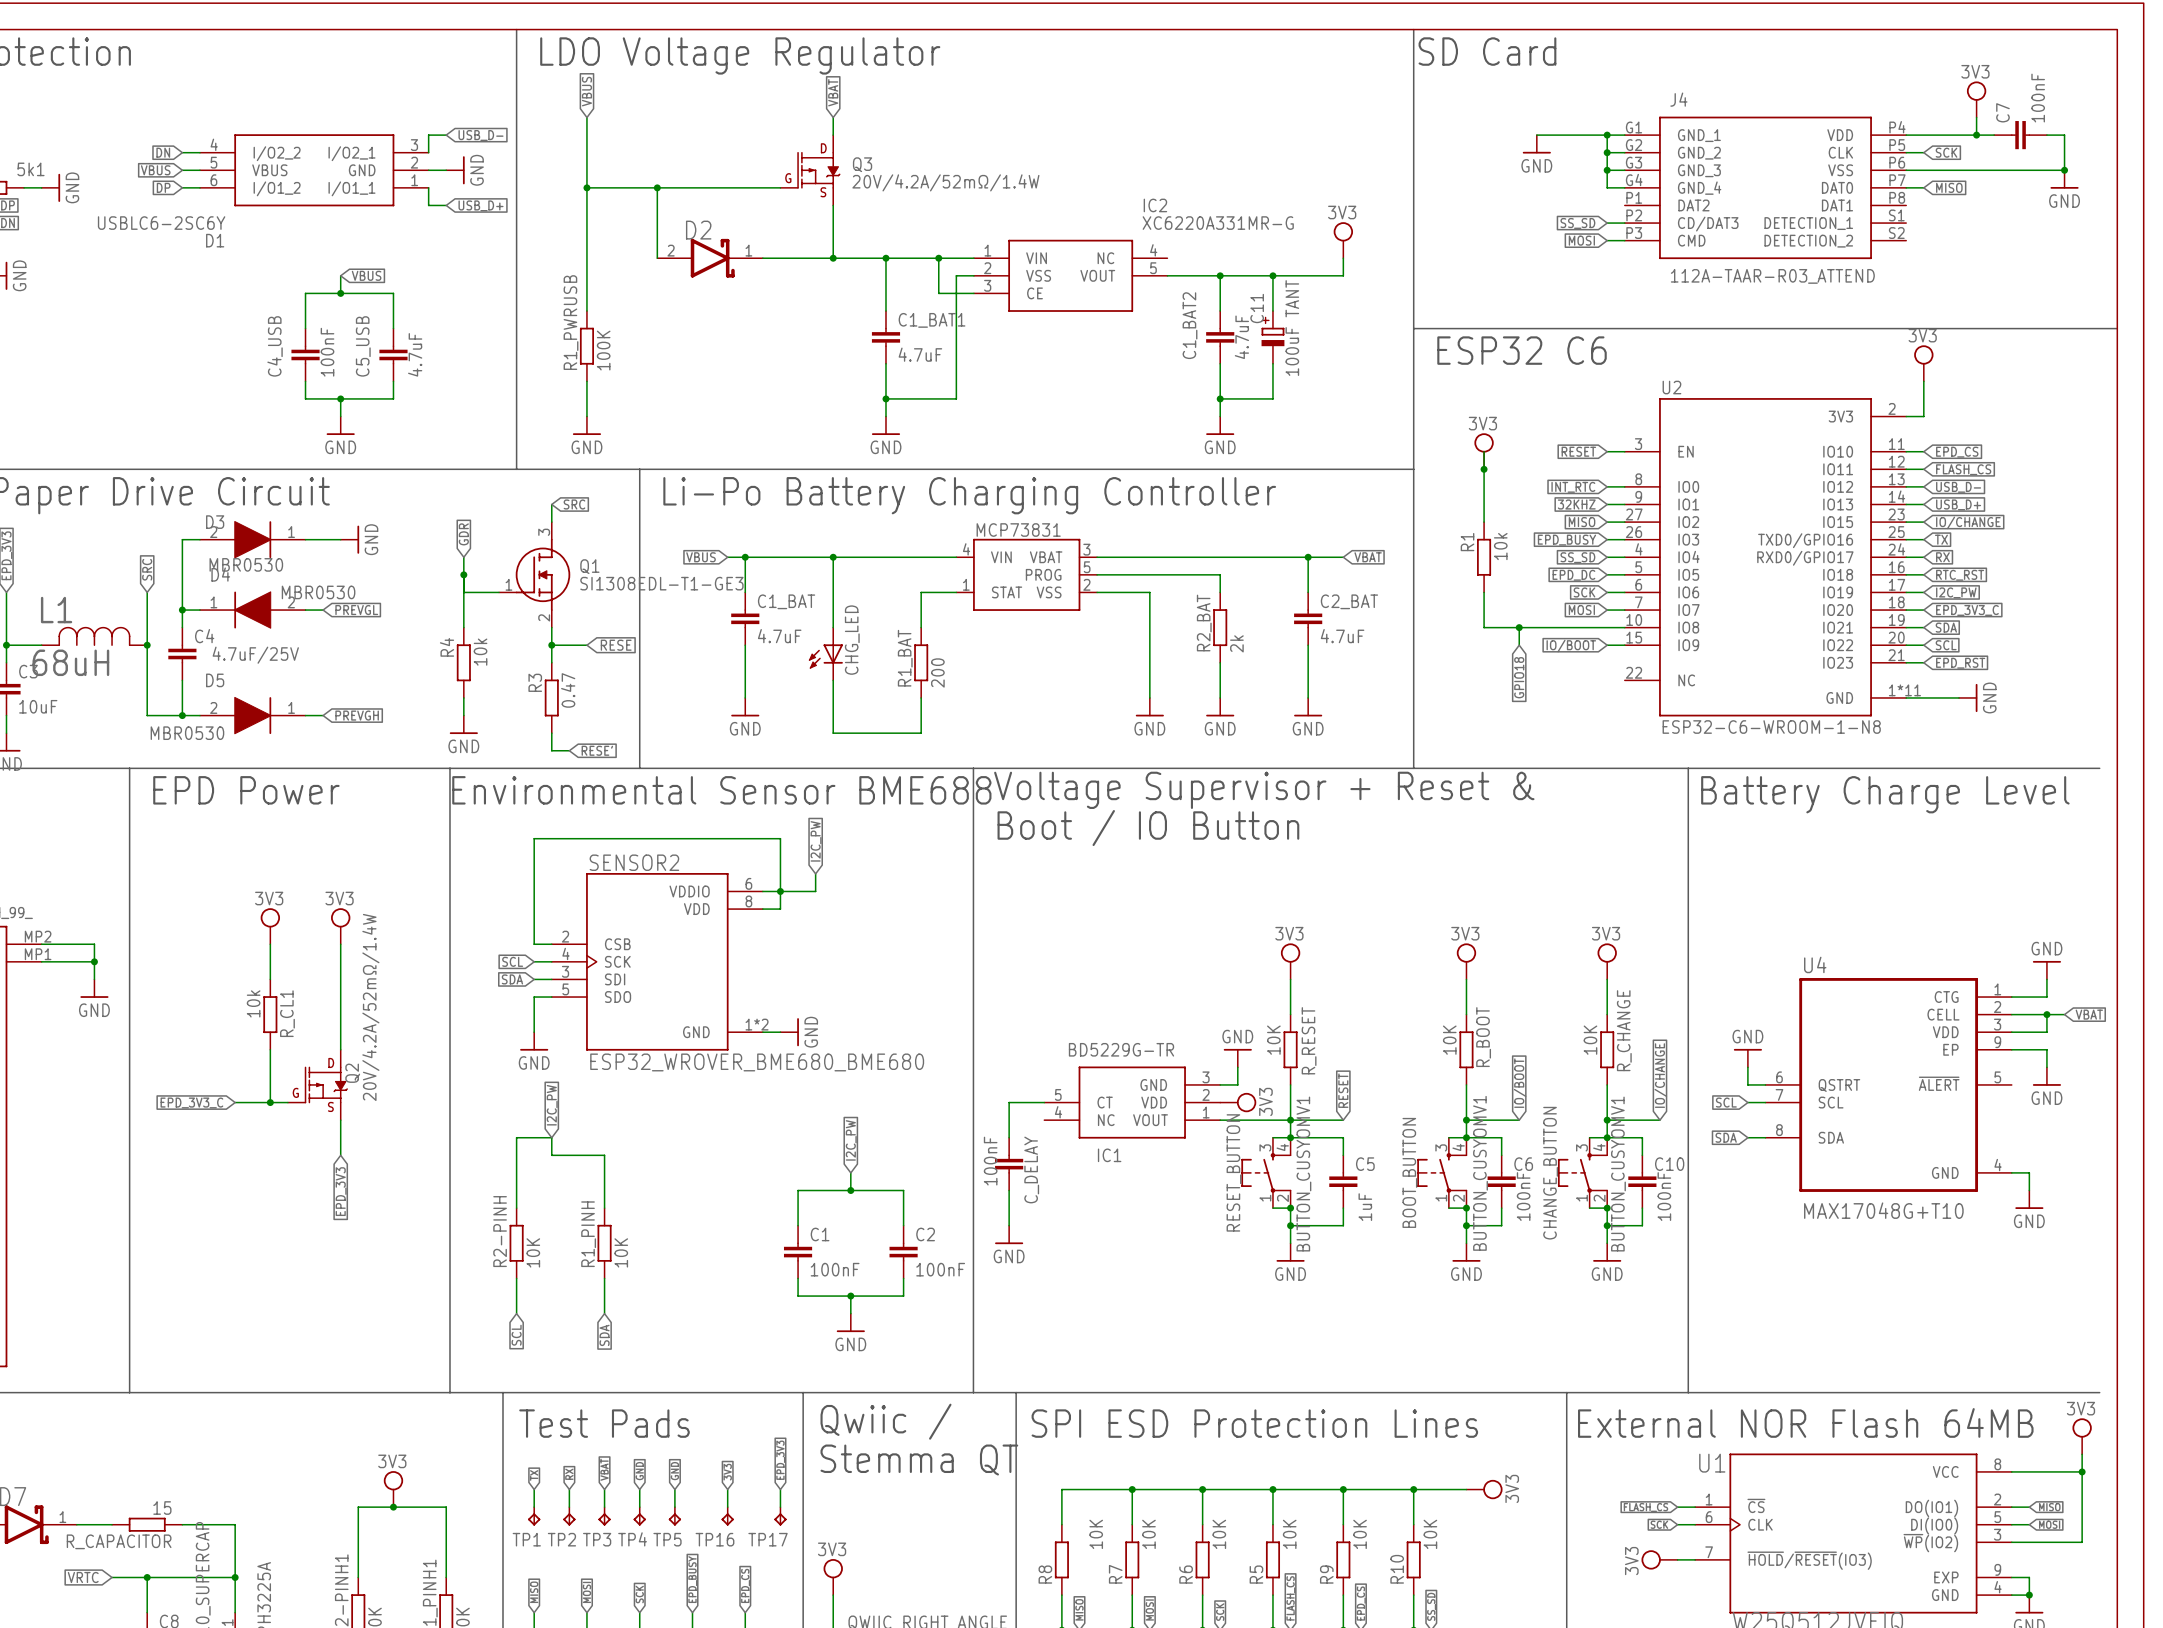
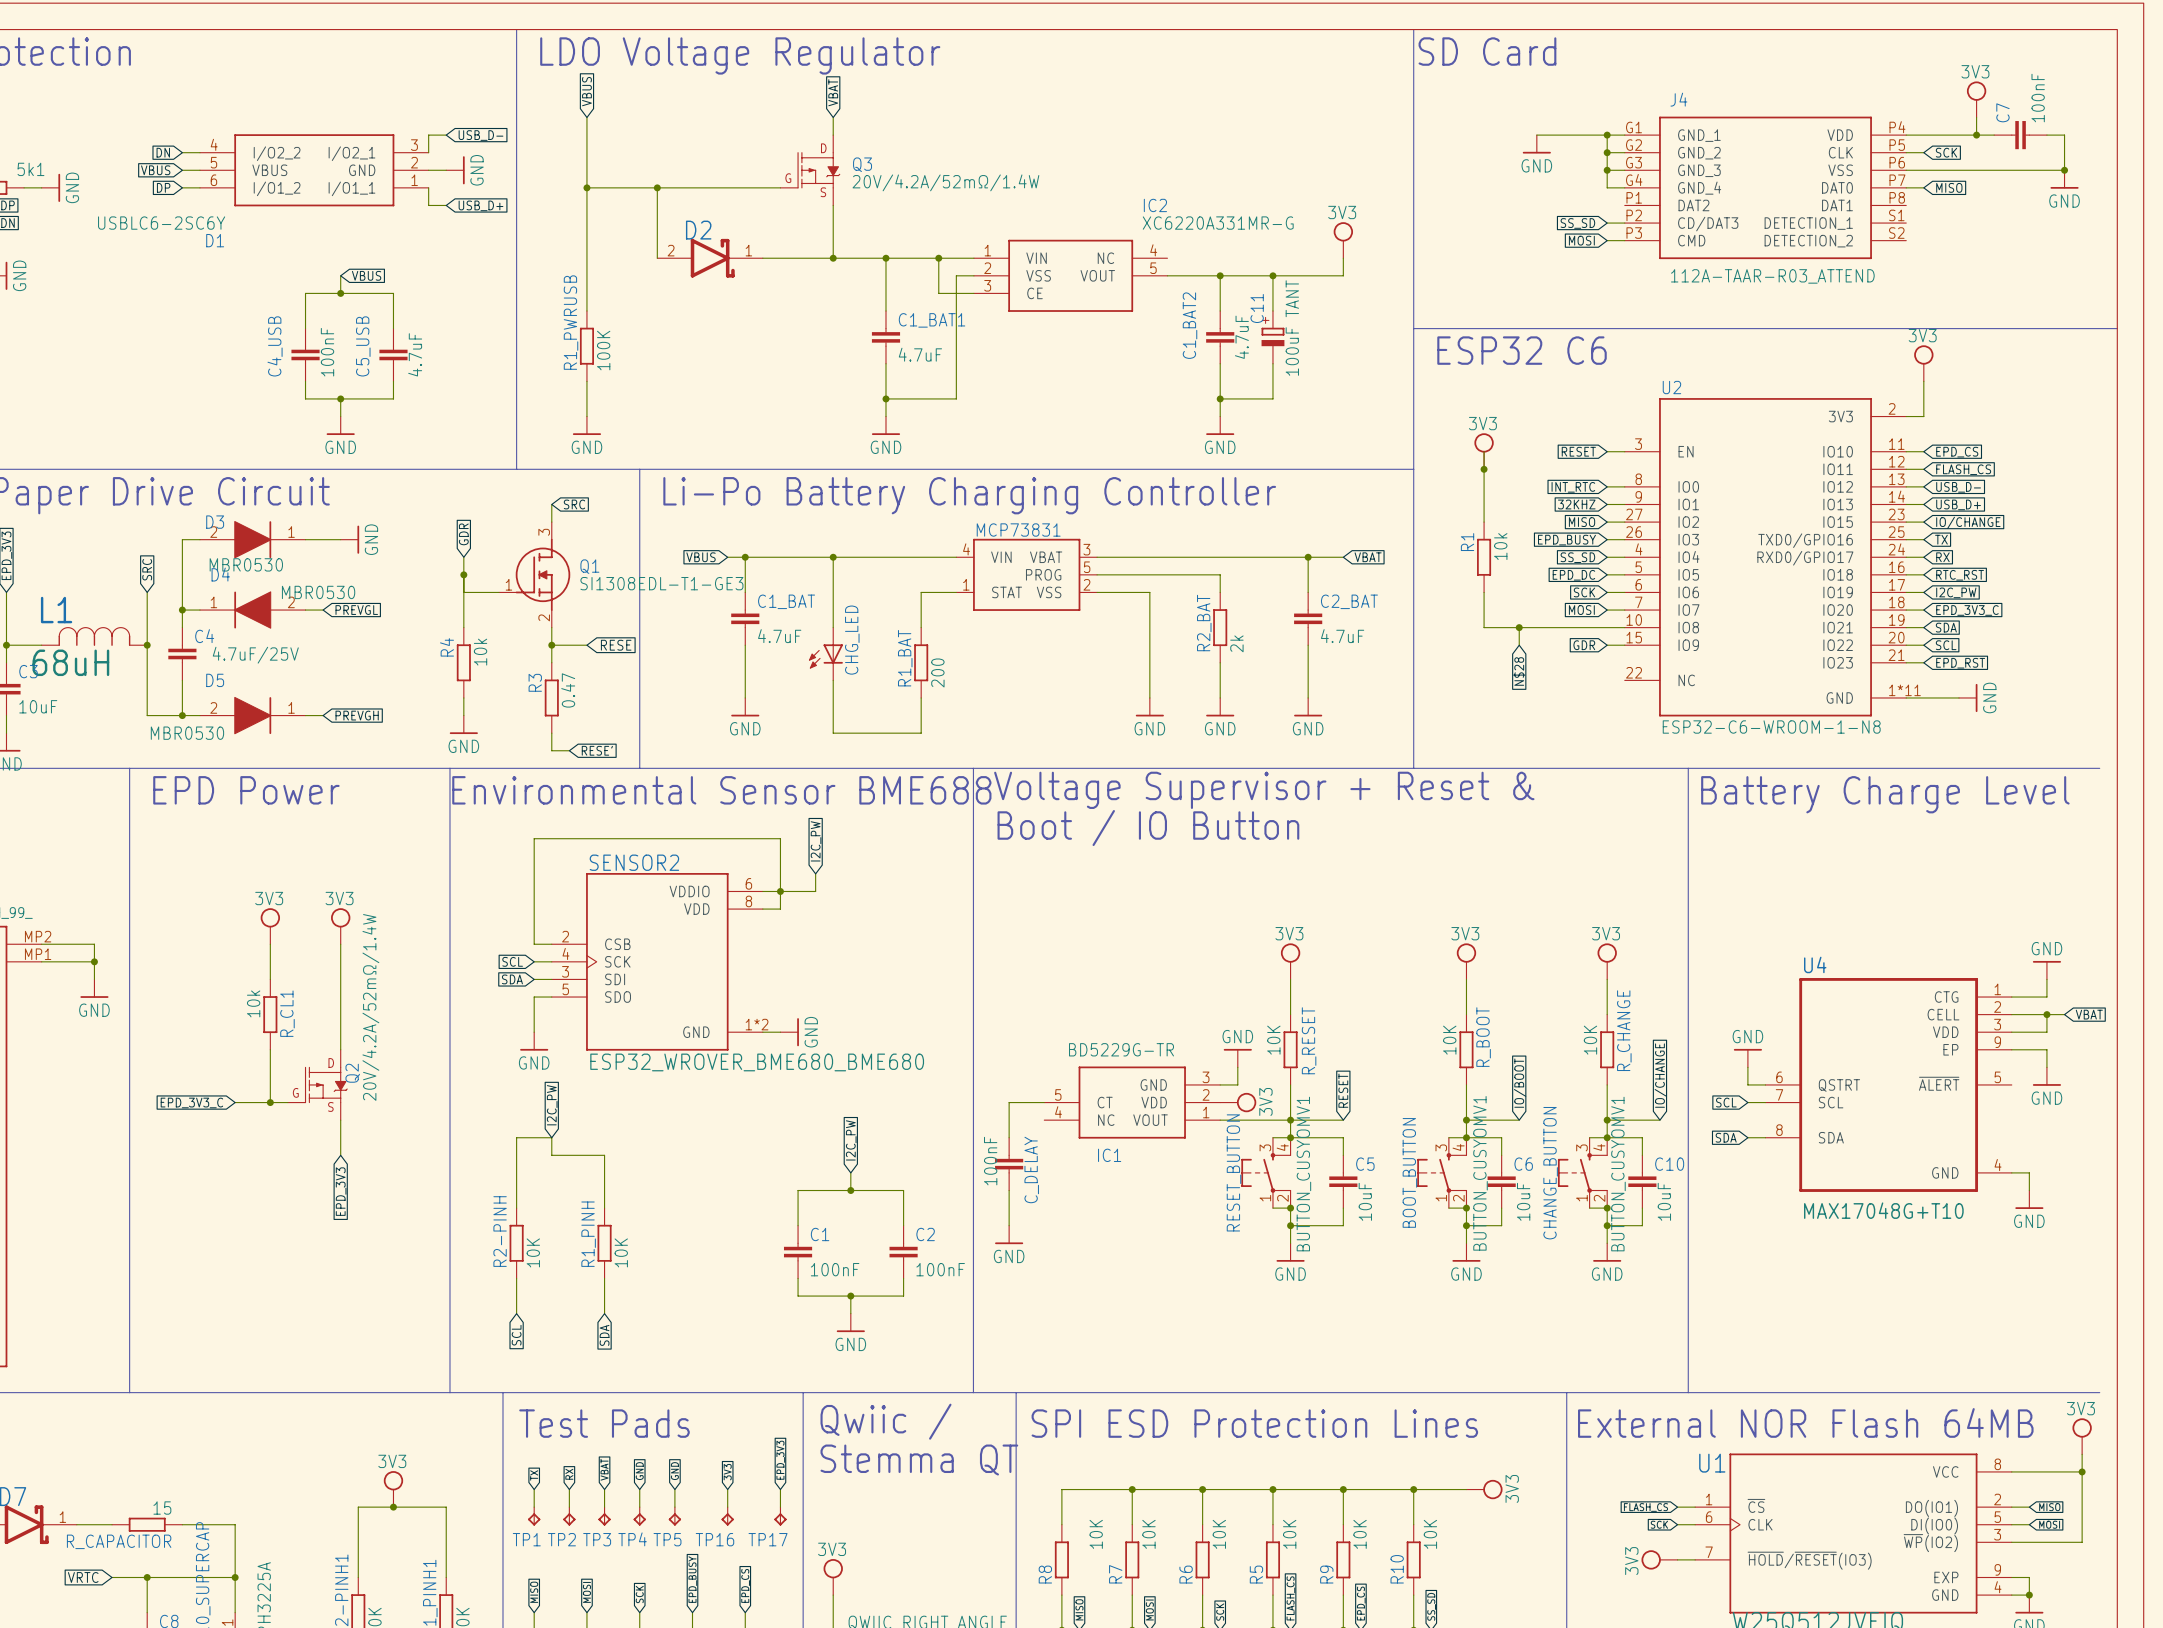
global label: IO/BOOT (1571, 646) -> GDR (1584, 645)
global label: GPIO18 (1519, 677) -> N$28 (1519, 671)
C6 value: 100nF (1523, 1196) -> 10uF (1523, 1201)
C10 value: 100nF (1664, 1196) -> 10uF (1664, 1201)
C5 value: 1uF (1365, 1207) -> 10uF (1365, 1201)

